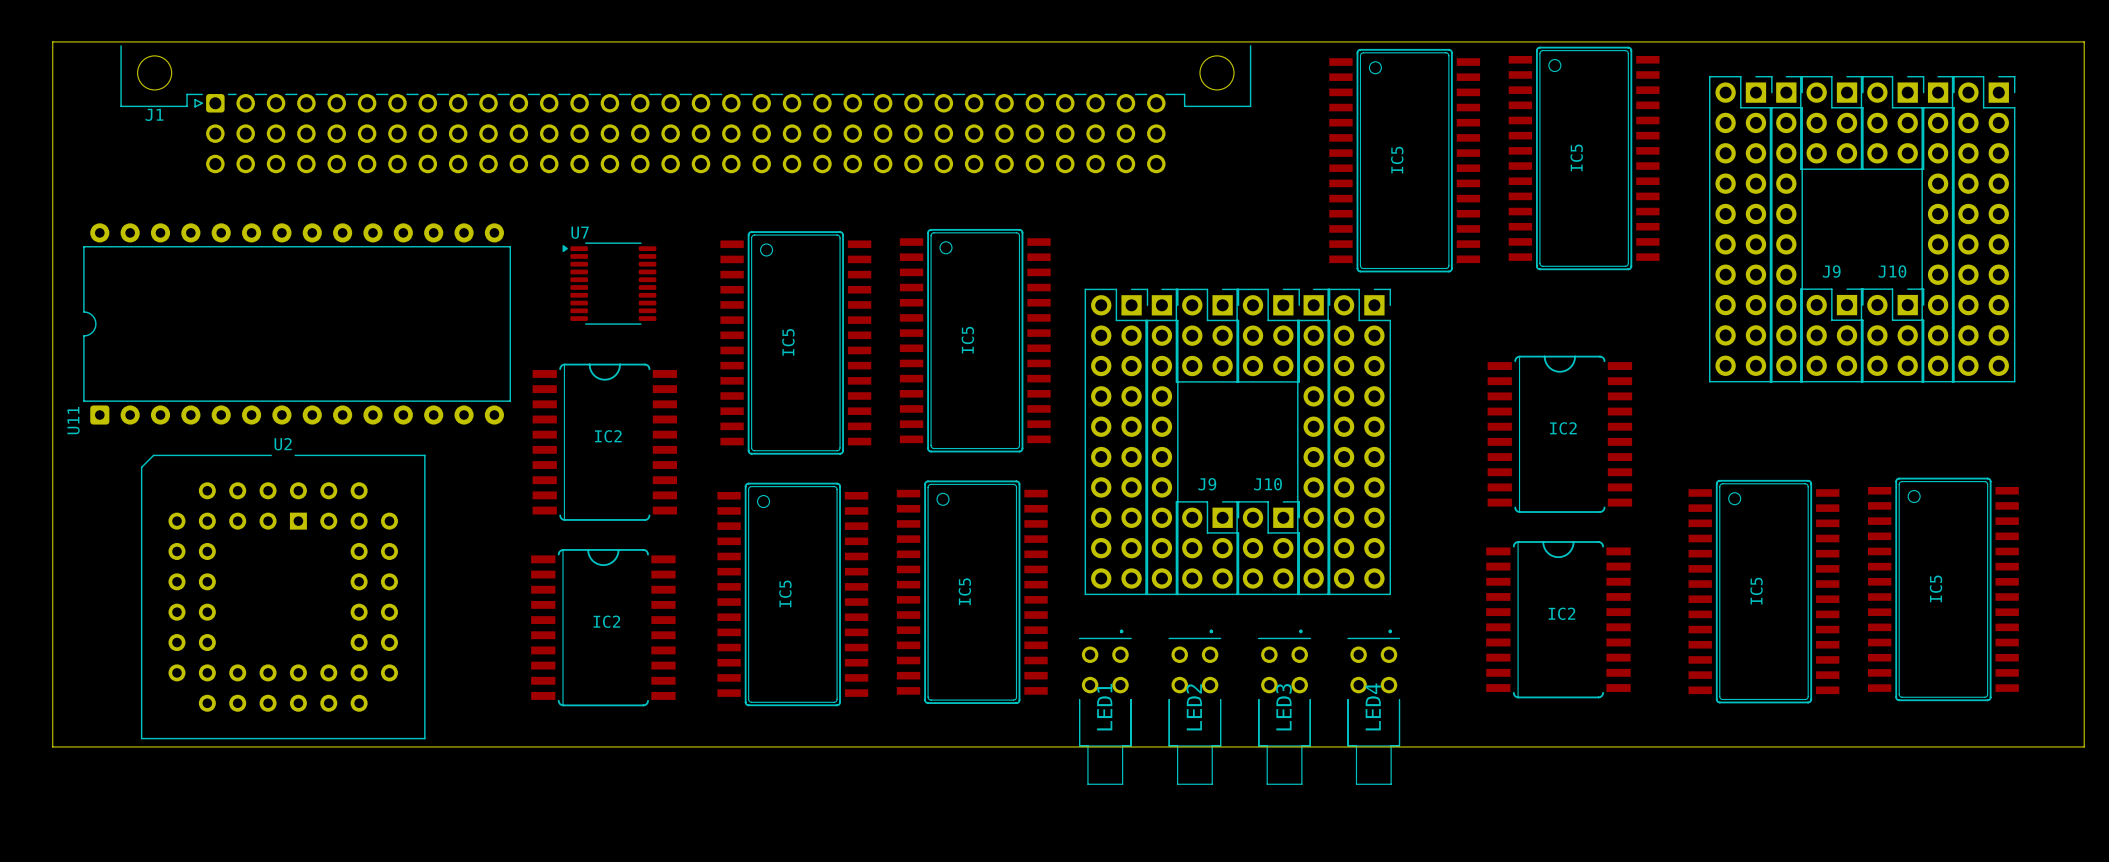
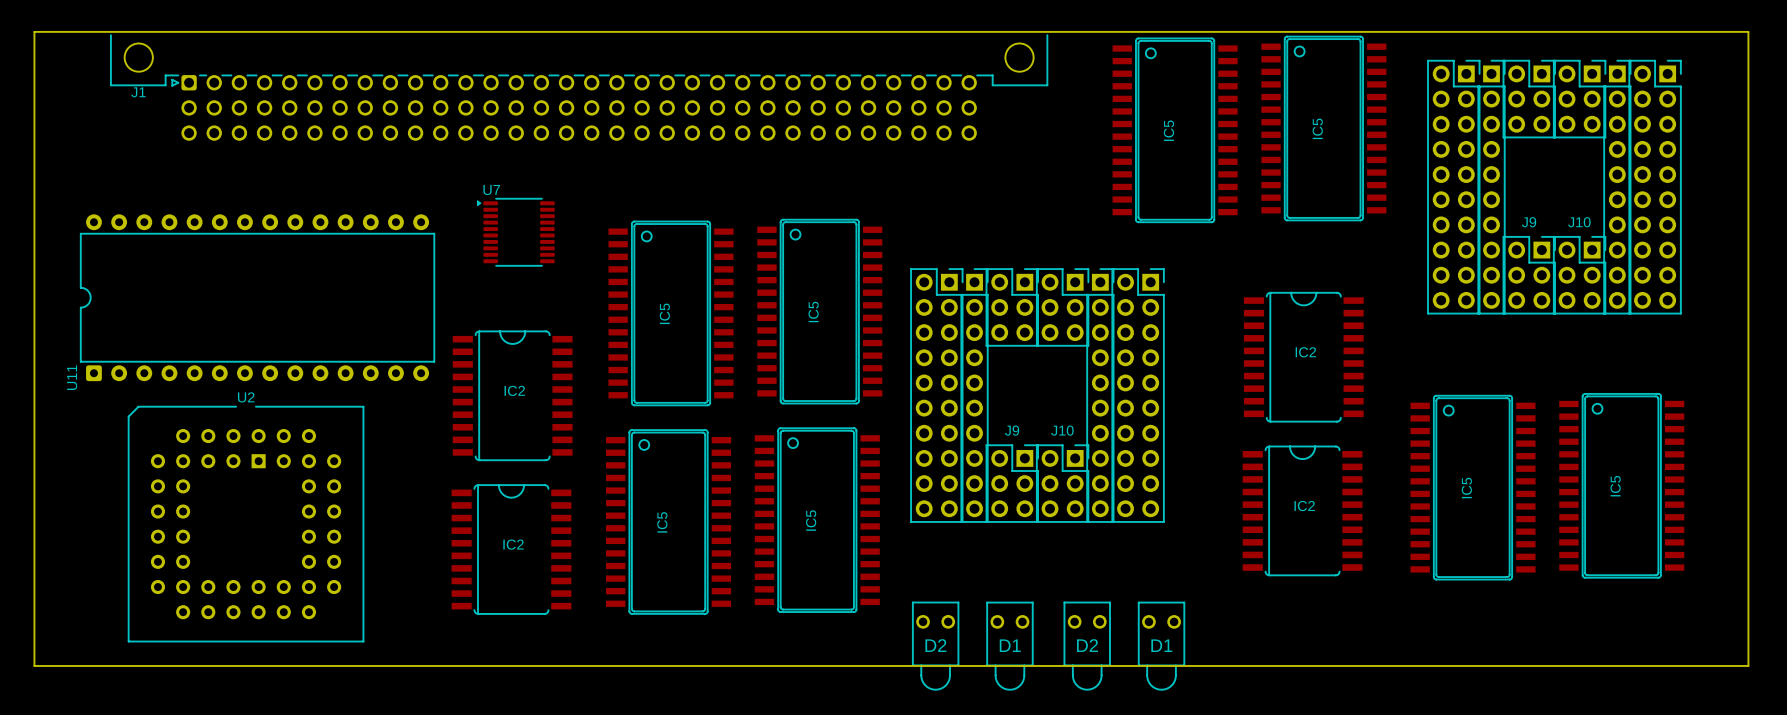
board edge: (52, 41) (52, 746) (2084, 746) (2084, 41) -> (54, 31) (34, 31) (34, 665) (1748, 665) (1748, 31) (1738, 31)
U11 position: (297, 323) -> (257, 297)
part: (1207, 335) -> none
part: (1268, 335) -> none
IC5 position: (975, 340) -> (819, 311)
IC5 position: (795, 342) -> (671, 313)
part: none -> (1012, 307)
part: none -> (1062, 307)
part position: (1116, 441) -> (936, 395)
part position: (1161, 441) -> (974, 395)
part position: (1313, 441) -> (1100, 395)
part position: (1359, 441) -> (1138, 395)
IC2 position: (604, 442) -> (512, 395)
J9 position: (1207, 548) -> (1012, 483)
J10 position: (1268, 548) -> (1062, 483)
IC5 position: (972, 592) -> (817, 520)
IC5 position: (792, 594) -> (668, 521)
U2 position: (283, 597) -> (246, 524)
IC2 position: (603, 627) -> (511, 549)
LED1: (1105, 707) -> none
LED2: (1194, 707) -> none
LED3: (1284, 707) -> none
LED4: (1373, 707) -> none
D2: none -> (935, 646)
D1: none -> (1009, 646)
D2: none -> (1087, 646)
D1: none -> (1161, 646)

